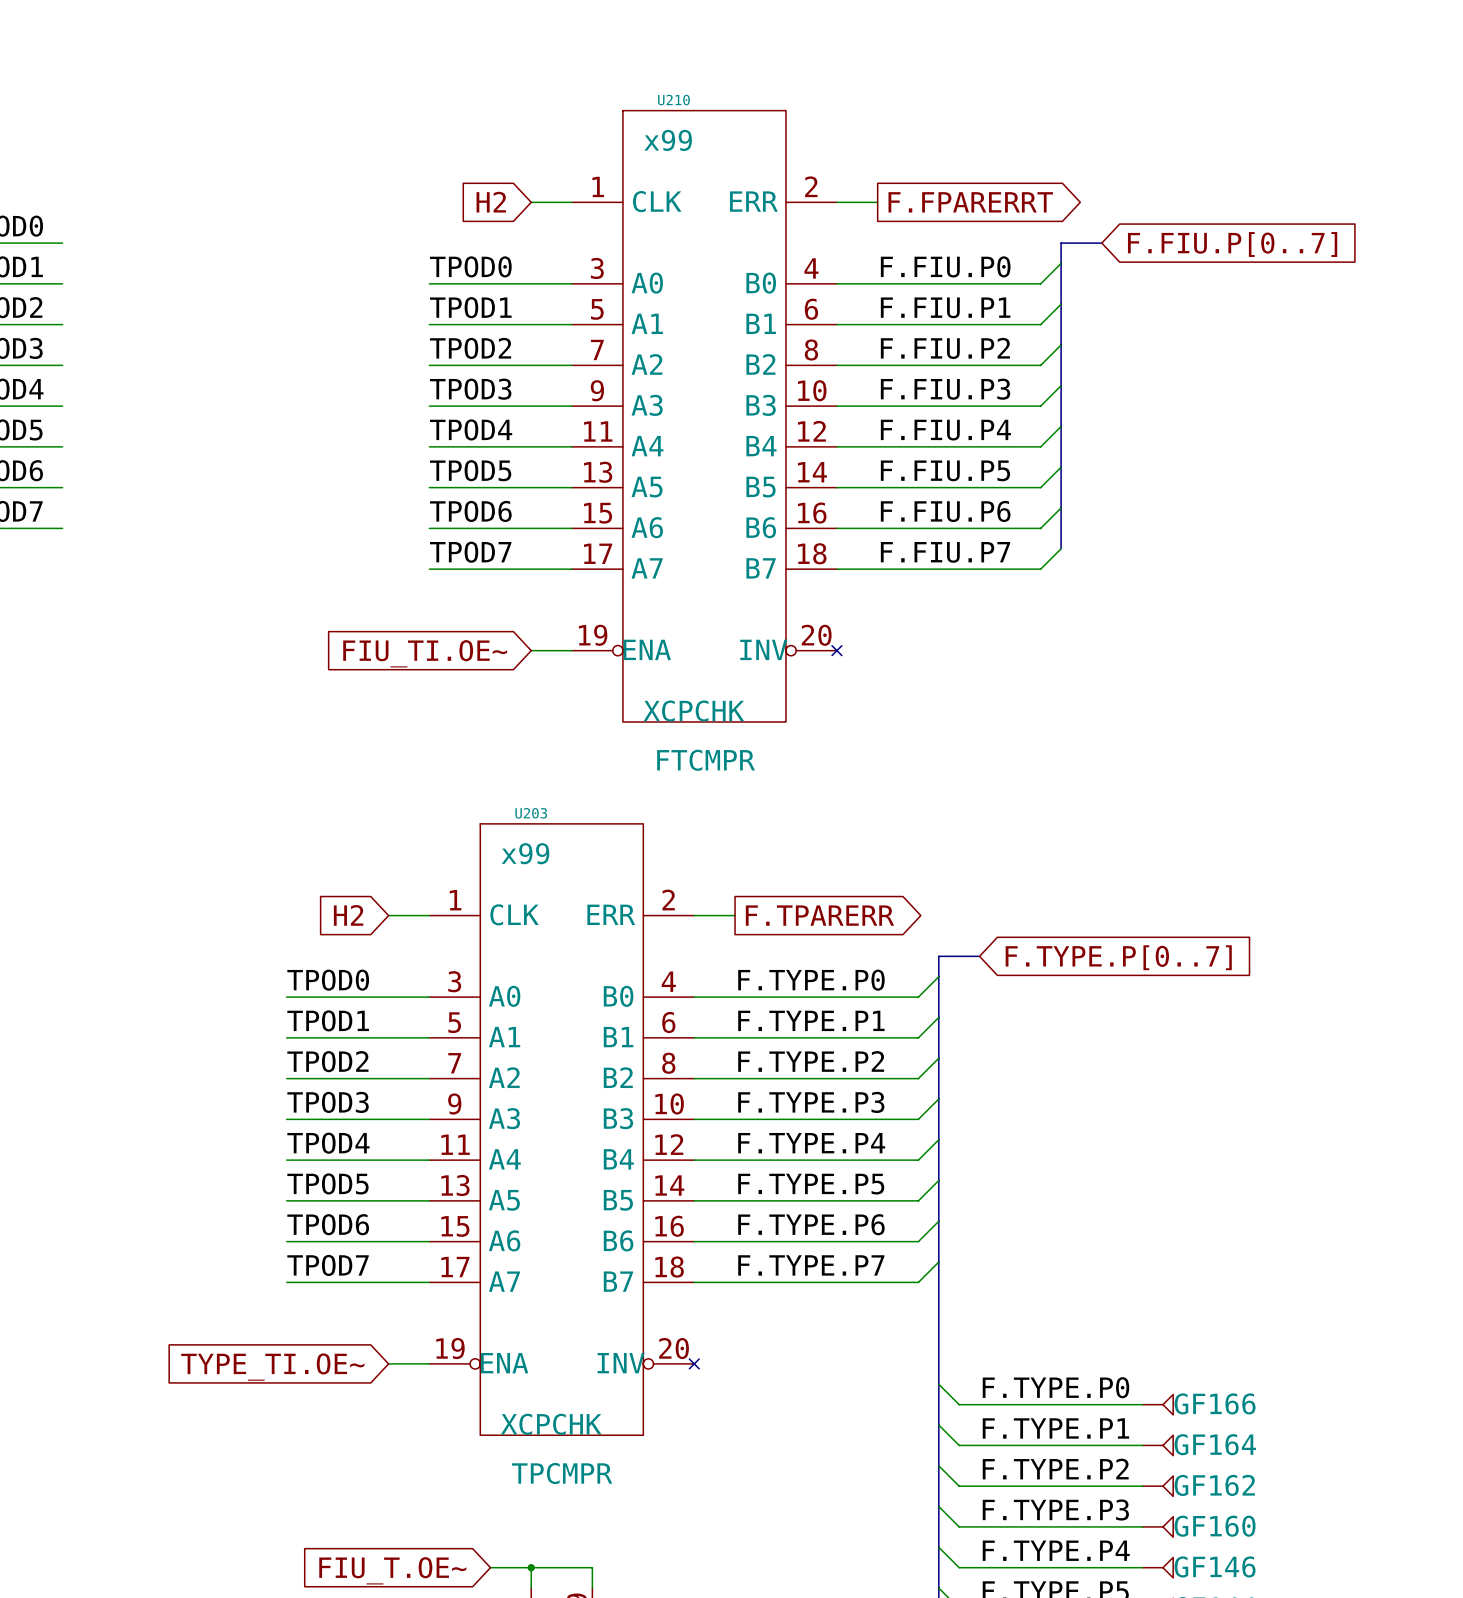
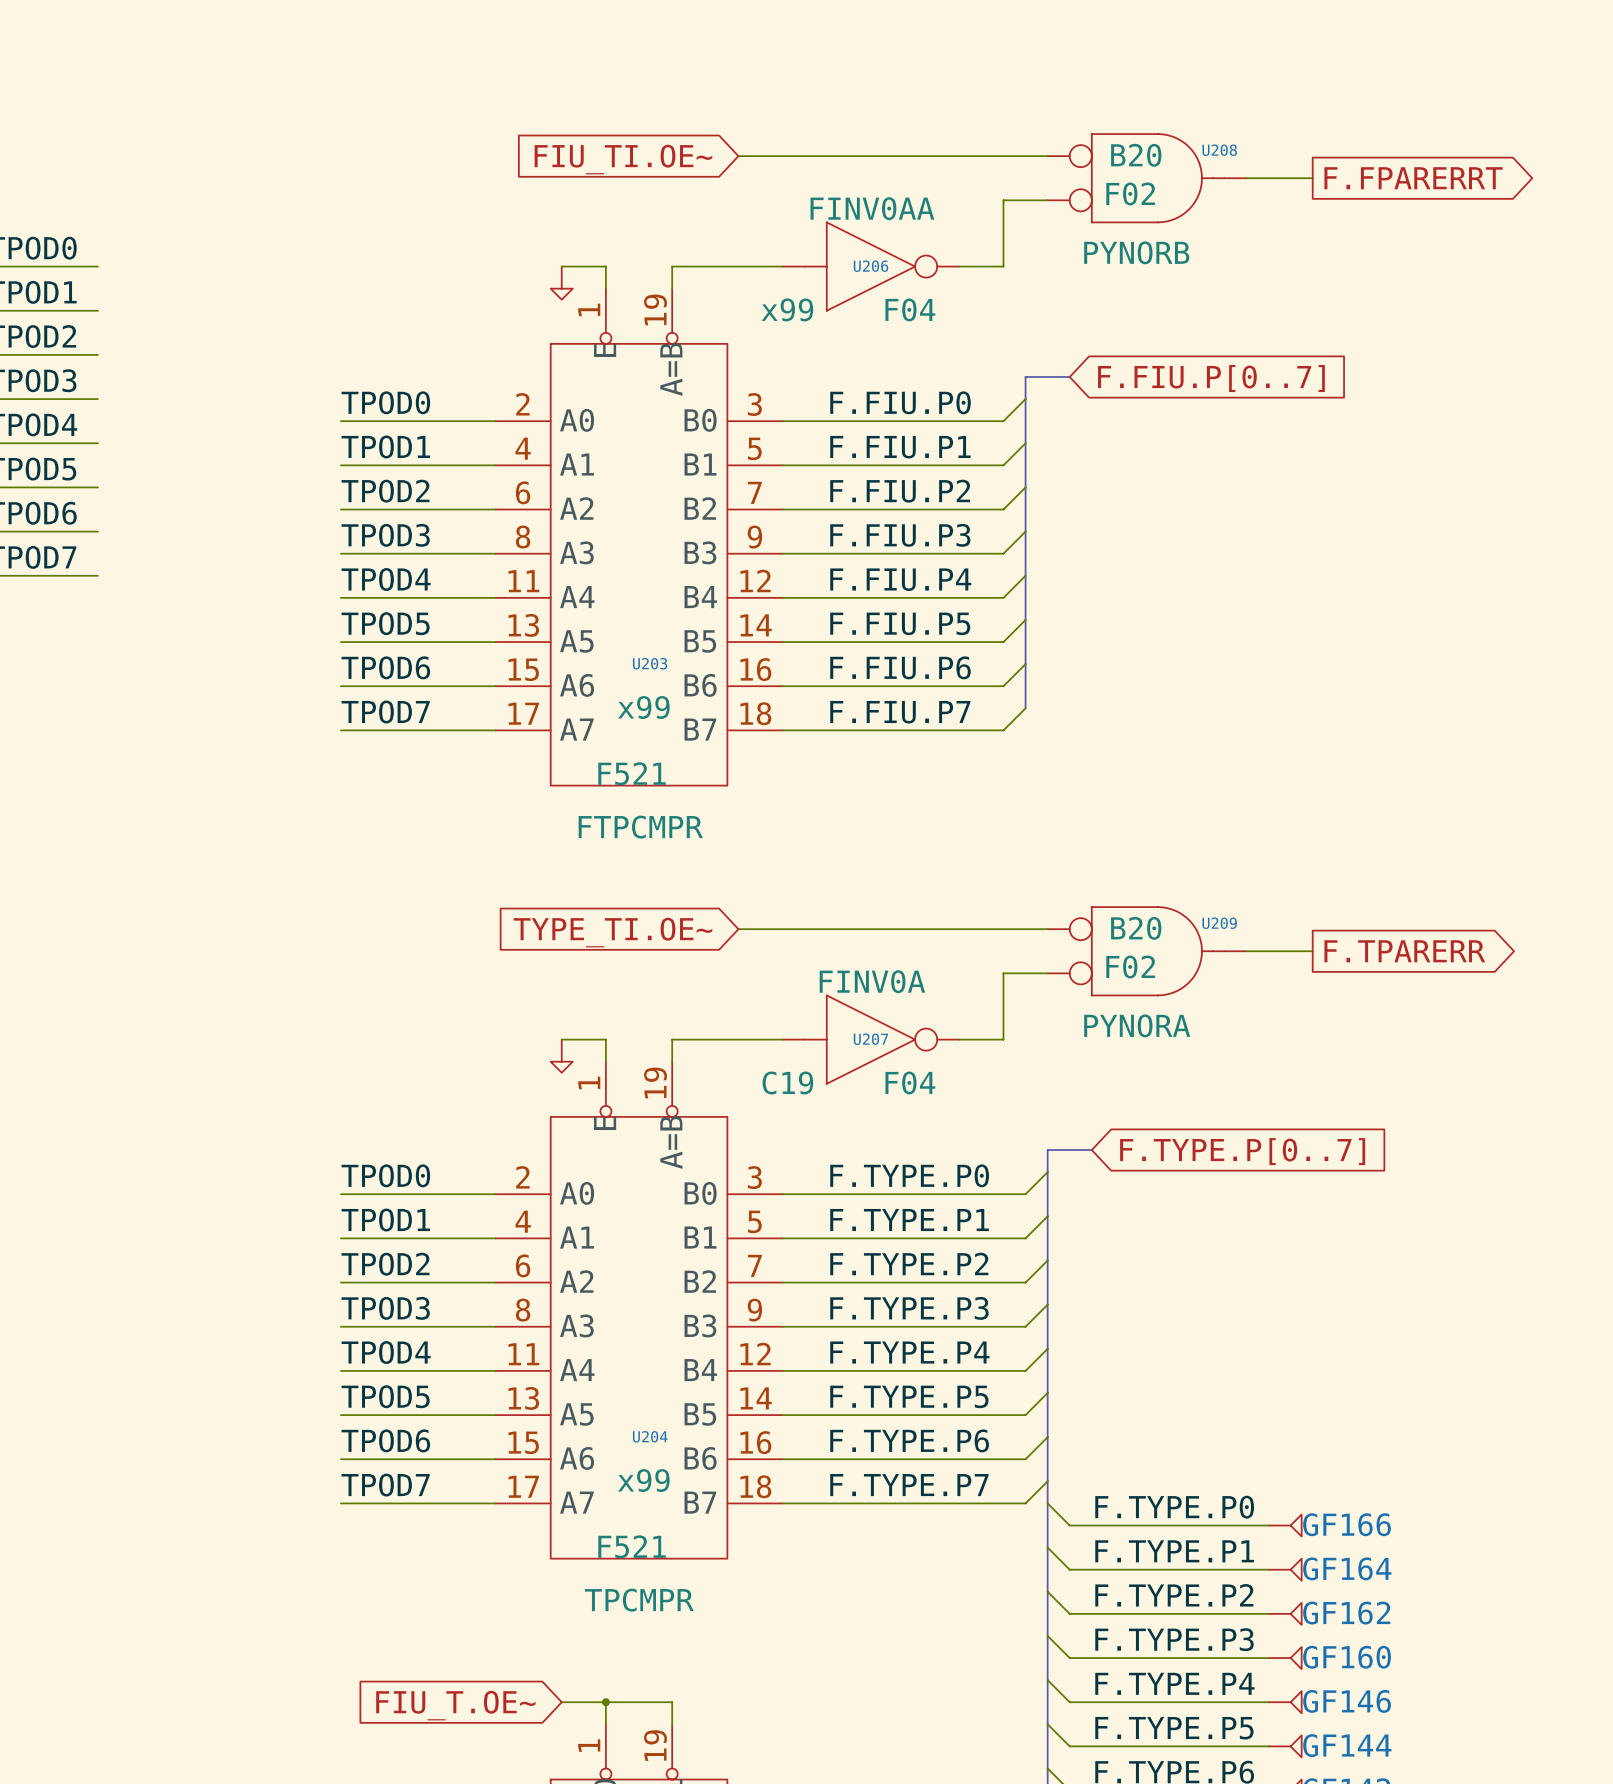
wire: none -> (738, 156) (1047, 156)
global label: none -> FIU_TI.OE~ (623, 159)
U208: none -> F02 (1147, 178)
wire: none -> (1246, 178) (1312, 178)
global label: none -> F.FPARERRT (1413, 178)
wire: none -> (1047, 200) (1003, 200) (1003, 266) (959, 266)
global label: H2 (491, 202) -> none
wire: (531, 202) (572, 202) -> none
wire: (836, 202) (877, 202) -> none
global label: F.FPARERRT (970, 202) -> none
wire: none -> (561, 266) (605, 266) (605, 288)
wire: none -> (782, 266) (672, 266) (672, 288)
U206: none -> F04 (870, 266)
bus: (1101, 243) (1061, 243) (1061, 548) -> (1069, 377) (1025, 377) (1025, 708)
global label position: F.FIU.P[0..7] (1232, 244) -> F.FIU.P[0..7] (1211, 378)
power symbol: none -> (561, 283)
wire: (1061, 263) (1040, 283) (836, 283) -> (1025, 399) (1003, 421) (782, 421)
label position: TPOD0 (470, 266) -> TPOD0 (385, 402)
label position: F.FIU.P0 (945, 266) -> F.FIU.P0 (900, 402)
wire: (429, 283) (572, 283) -> (340, 421) (495, 421)
wire: (1061, 304) (1040, 324) (836, 324) -> (1025, 443) (1003, 465) (782, 465)
label position: TPOD1 (470, 307) -> TPOD1 (385, 446)
label position: F.FIU.P1 (945, 307) -> F.FIU.P1 (900, 447)
wire: (429, 324) (572, 324) -> (340, 465) (495, 465)
wire: (1061, 344) (1040, 365) (836, 365) -> (1025, 487) (1003, 509) (782, 509)
label position: TPOD2 (470, 348) -> TPOD2 (385, 491)
label position: F.FIU.P2 (945, 348) -> F.FIU.P2 (900, 491)
wire: (429, 365) (572, 365) -> (340, 509) (495, 509)
wire: (1061, 385) (1040, 406) (836, 406) -> (1025, 531) (1003, 553) (782, 553)
label position: TPOD3 (470, 389) -> TPOD3 (385, 535)
label position: F.FIU.P3 (945, 389) -> F.FIU.P3 (900, 535)
wire: (429, 406) (572, 406) -> (340, 553) (495, 553)
U210: XCPCHK (704, 416) -> none
wire: (1061, 426) (1040, 446) (836, 446) -> (1025, 575) (1003, 597) (782, 597)
label position: TPOD4 (471, 429) -> TPOD4 (386, 579)
label position: F.FIU.P4 (945, 430) -> F.FIU.P4 (900, 579)
wire: (429, 446) (572, 446) -> (340, 597) (495, 597)
wire: (1061, 467) (1040, 487) (836, 487) -> (1025, 619) (1003, 642) (782, 642)
label position: TPOD5 (470, 470) -> TPOD5 (385, 623)
label position: F.FIU.P5 (945, 470) -> F.FIU.P5 (900, 623)
wire: (429, 487) (572, 487) -> (340, 642) (495, 642)
wire: (1061, 508) (1040, 528) (836, 528) -> (1025, 664) (1003, 686) (782, 686)
label position: TPOD6 (470, 511) -> TPOD6 (385, 667)
label position: F.FIU.P6 (945, 511) -> F.FIU.P6 (900, 667)
wire: (429, 528) (572, 528) -> (340, 686) (495, 686)
wire: (1061, 548) (1040, 569) (836, 569) -> (1025, 708) (1003, 730) (782, 730)
label position: TPOD7 (470, 552) -> TPOD7 (385, 712)
label position: F.FIU.P7 (945, 552) -> F.FIU.P7 (900, 712)
wire: (429, 569) (572, 569) -> (340, 730) (495, 730)
wire: (531, 650) (572, 650) -> none
no-connect mark: (836, 650) -> none
global label: FIU_TI.OE~ (425, 653) -> none
U203 name position: U203 (531, 813) -> U203 (650, 663)
U203 symbol: [429, 823, 695, 1436] -> [495, 288, 783, 786]
U203 text position: x99 (525, 853) -> x99 (643, 707)
wire: none -> (738, 929) (1047, 929)
global label: none -> TYPE_TI.OE~ (612, 932)
U209: none -> F02 (1147, 951)
wire: none -> (1246, 951) (1312, 951)
global label: none -> F.TPARERR (1404, 951)
wire: none -> (1047, 973) (1003, 973) (1003, 1039) (959, 1039)
global label: H2 (348, 915) -> none
wire: (388, 915) (429, 915) -> none
wire: (694, 915) (735, 915) -> none
global label: F.TPARERR (819, 915) -> none
wire: none -> (561, 1039) (605, 1039) (605, 1061)
wire: none -> (782, 1039) (672, 1039) (672, 1061)
U207: none -> F04 (870, 1039)
bus: (979, 956) (938, 956) (938, 1058) -> (1091, 1150) (1047, 1150)
global label position: F.TYPE.P[0..7] (1118, 957) -> F.TYPE.P[0..7] (1242, 1151)
power symbol: none -> (561, 1056)
wire: (938, 976) (918, 997) (694, 997) -> (1047, 1172) (1025, 1194) (782, 1194)
label position: TPOD0 (328, 980) -> TPOD0 (385, 1175)
label position: F.TYPE.P0 (811, 980) -> F.TYPE.P0 (909, 1175)
wire: (286, 997) (429, 997) -> (340, 1194) (495, 1194)
wire: (938, 1017) (918, 1037) (694, 1037) -> (1047, 1216) (1025, 1238) (782, 1238)
label position: TPOD1 (328, 1020) -> TPOD1 (385, 1220)
label position: F.TYPE.P1 (811, 1020) -> F.TYPE.P1 (909, 1220)
wire: (286, 1037) (429, 1037) -> (340, 1238) (495, 1238)
wire: (938, 1058) (918, 1078) (694, 1078) -> (1047, 1260) (1025, 1282) (782, 1282)
label position: TPOD2 (327, 1061) -> TPOD2 (385, 1264)
label position: F.TYPE.P2 (811, 1061) -> F.TYPE.P2 (909, 1263)
wire: (286, 1078) (429, 1078) -> (340, 1282) (495, 1282)
wire: (938, 1098) (918, 1119) (694, 1119) -> (1047, 1304) (1025, 1326) (782, 1326)
label position: TPOD3 (328, 1102) -> TPOD3 (385, 1308)
label position: F.TYPE.P3 (811, 1102) -> F.TYPE.P3 (909, 1308)
wire: (286, 1119) (429, 1119) -> (340, 1326) (495, 1326)
wire: (938, 1139) (918, 1160) (694, 1160) -> (1047, 1348) (1025, 1370) (782, 1370)
label position: TPOD4 (328, 1143) -> TPOD4 (386, 1352)
label position: F.TYPE.P4 (811, 1143) -> F.TYPE.P4 (909, 1352)
wire: (286, 1160) (429, 1160) -> (340, 1370) (495, 1370)
wire: (938, 1180) (918, 1200) (694, 1200) -> (1047, 1393) (1025, 1415) (782, 1415)
label position: TPOD5 (327, 1183) -> TPOD5 (385, 1396)
label position: F.TYPE.P5 (811, 1184) -> F.TYPE.P5 (909, 1396)
wire: (286, 1200) (429, 1200) -> (340, 1415) (495, 1415)
U204: none -> F521 (639, 1310)
wire: (938, 1221) (918, 1241) (694, 1241) -> (1047, 1437) (1025, 1459) (782, 1459)
label position: TPOD6 (328, 1224) -> TPOD6 (385, 1440)
label position: F.TYPE.P6 (811, 1224) -> F.TYPE.P6 (909, 1440)
wire: (286, 1241) (429, 1241) -> (340, 1459) (495, 1459)
wire: (938, 1262) (918, 1282) (694, 1282) -> (1047, 1481) (1025, 1503) (782, 1503)
label position: TPOD7 (328, 1265) -> TPOD7 (385, 1485)
label position: F.TYPE.P7 (811, 1265) -> F.TYPE.P7 (909, 1485)
wire: (286, 1282) (429, 1282) -> (340, 1503) (495, 1503)
wire: (388, 1363) (429, 1363) -> none
no-connect mark: (694, 1363) -> none
global label: TYPE_TI.OE~ (272, 1367) -> none
U203 value: XCPCHK (551, 1424) -> F521 (632, 773)
U203 text: TPCMPR (562, 1473) -> FTPCMPR (640, 827)

